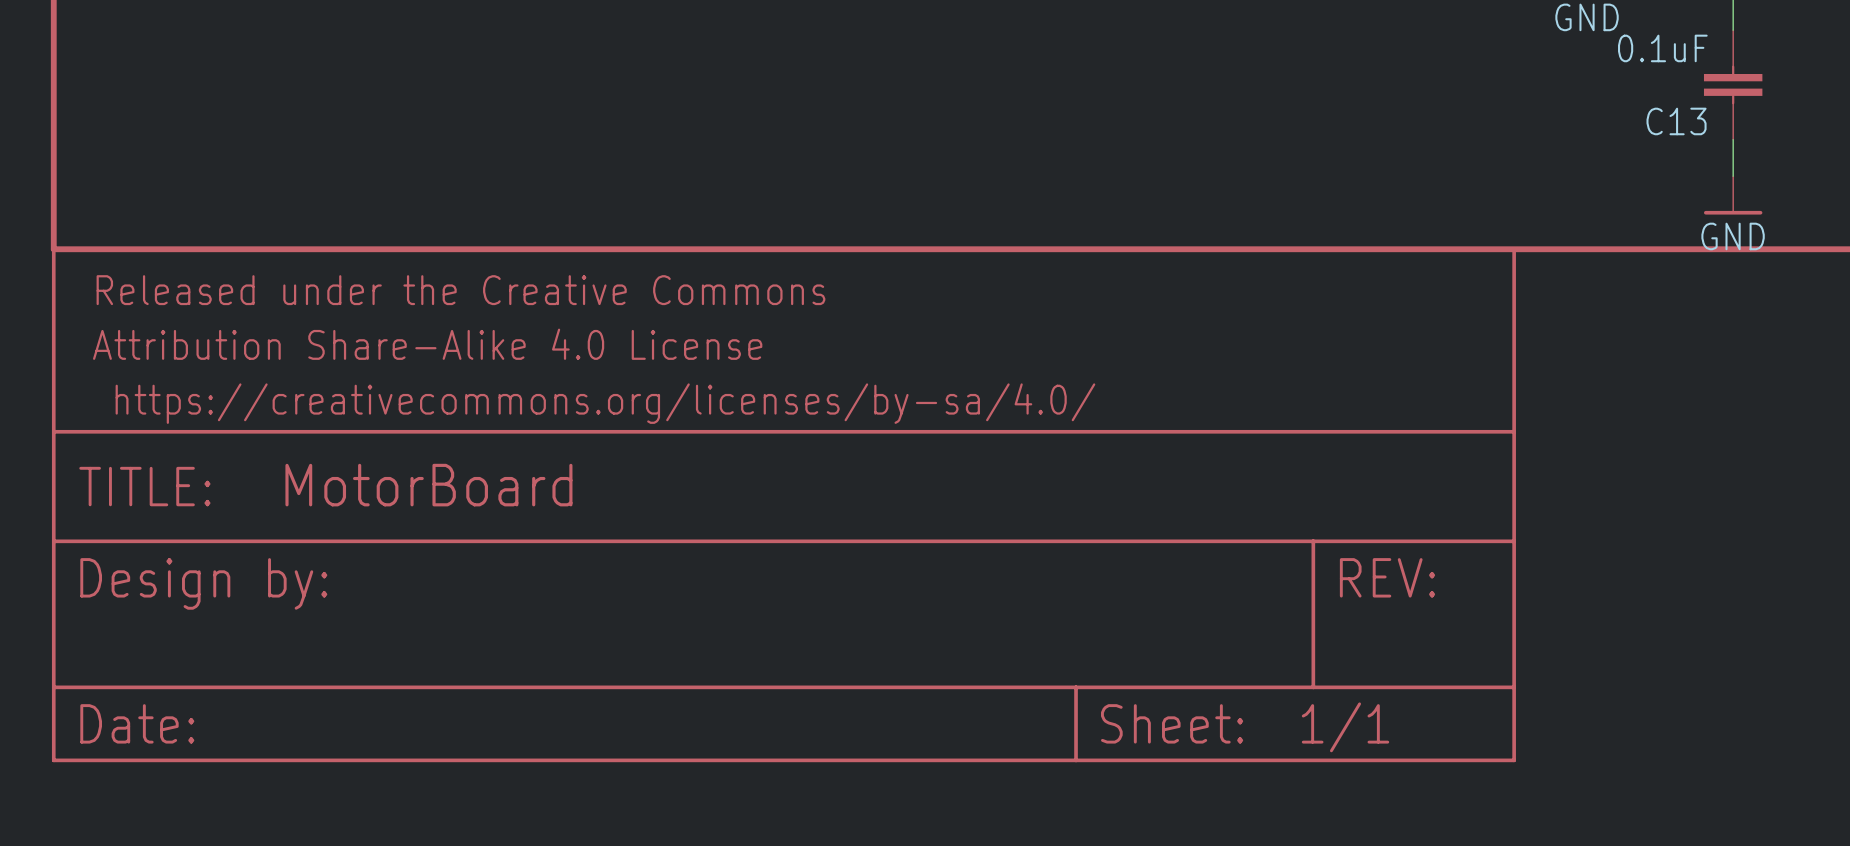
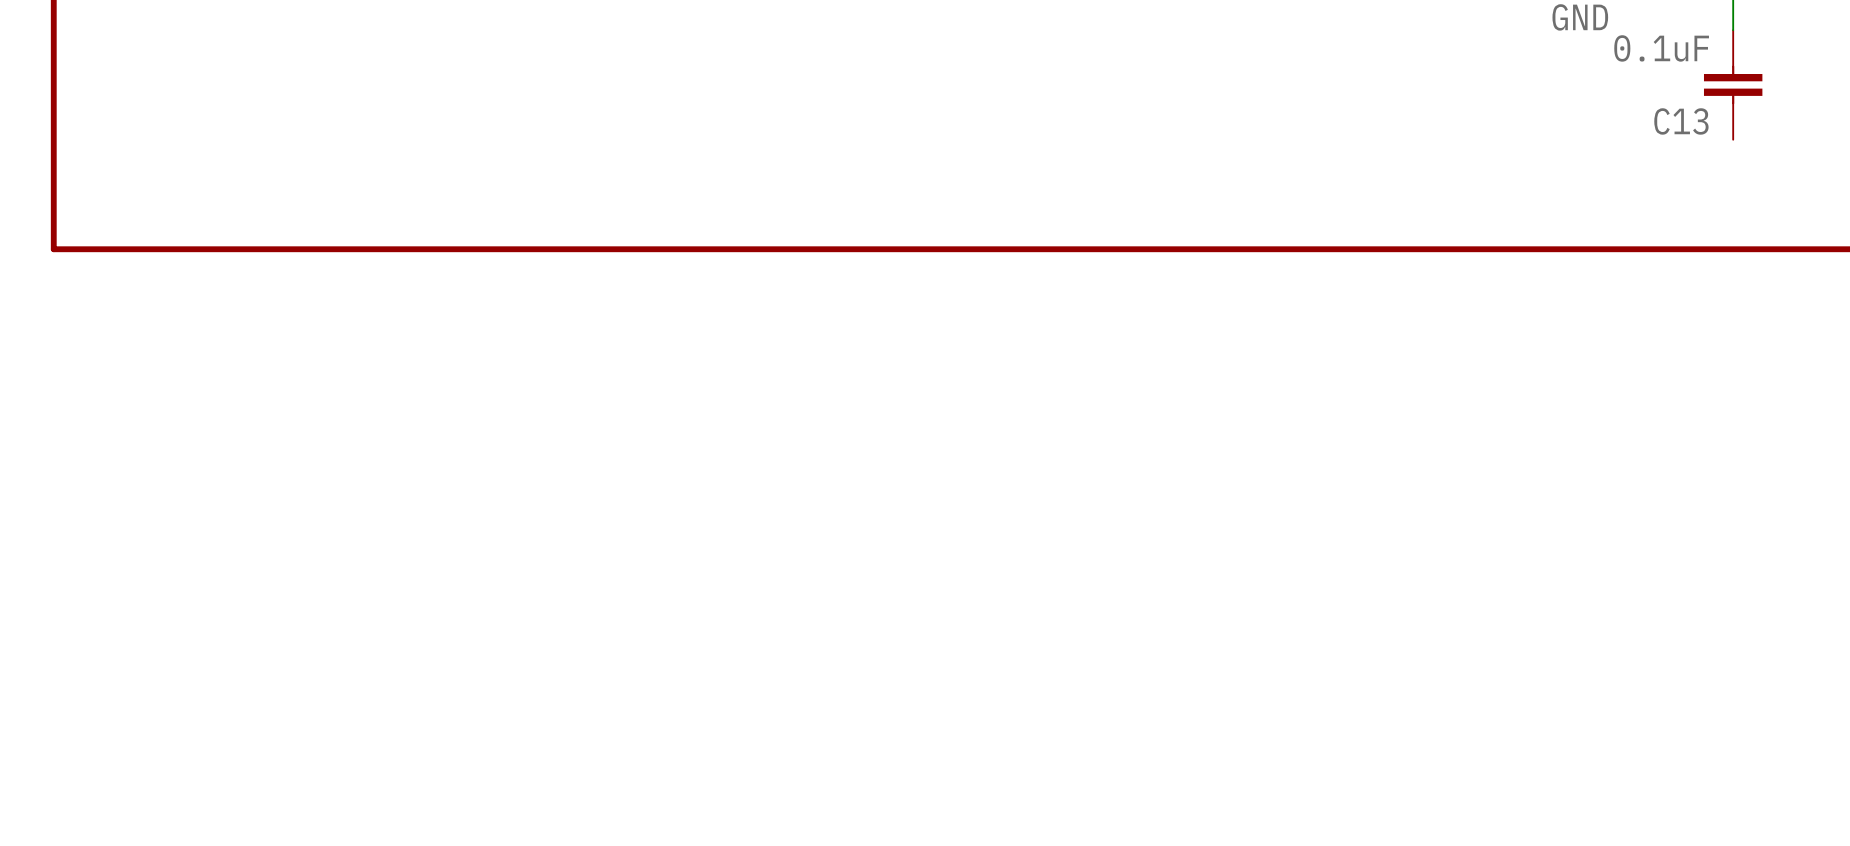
wire: (1733, 139) (1733, 176) -> none
power symbol: GND (1733, 195) -> none
part: (783, 504) -> none

